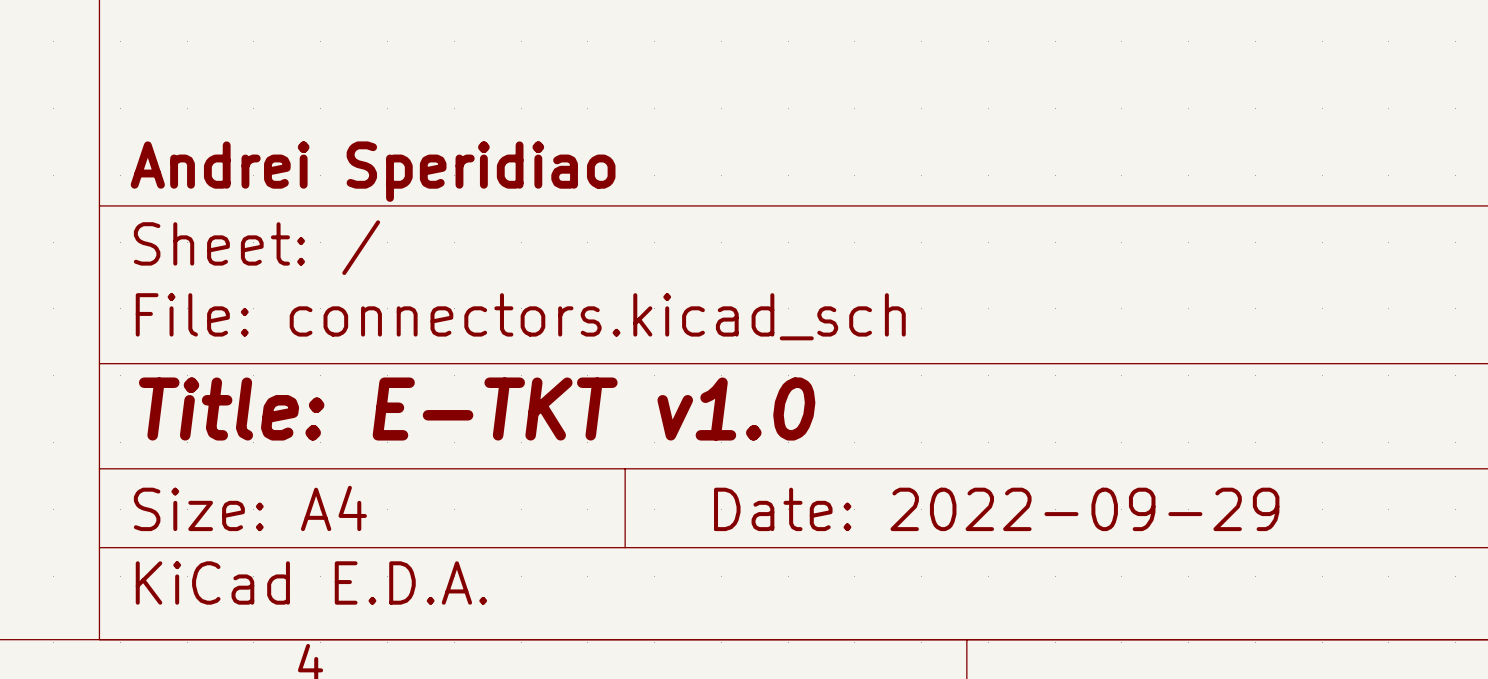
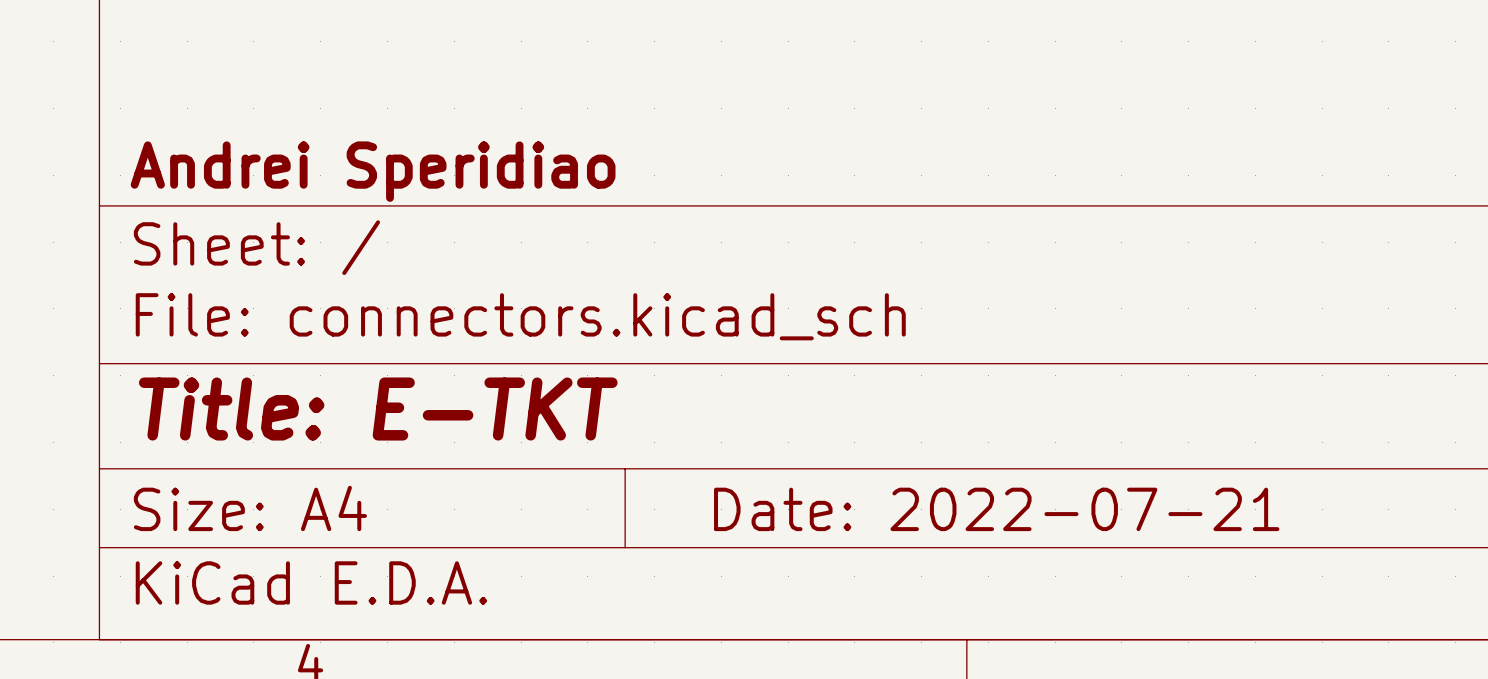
title block: Title: E-TKT v1.0 (477, 409) -> Title: E-TKT (378, 409)
title block: Date: 2022-09-29 (996, 509) -> Date: 2022-07-21 (996, 509)

